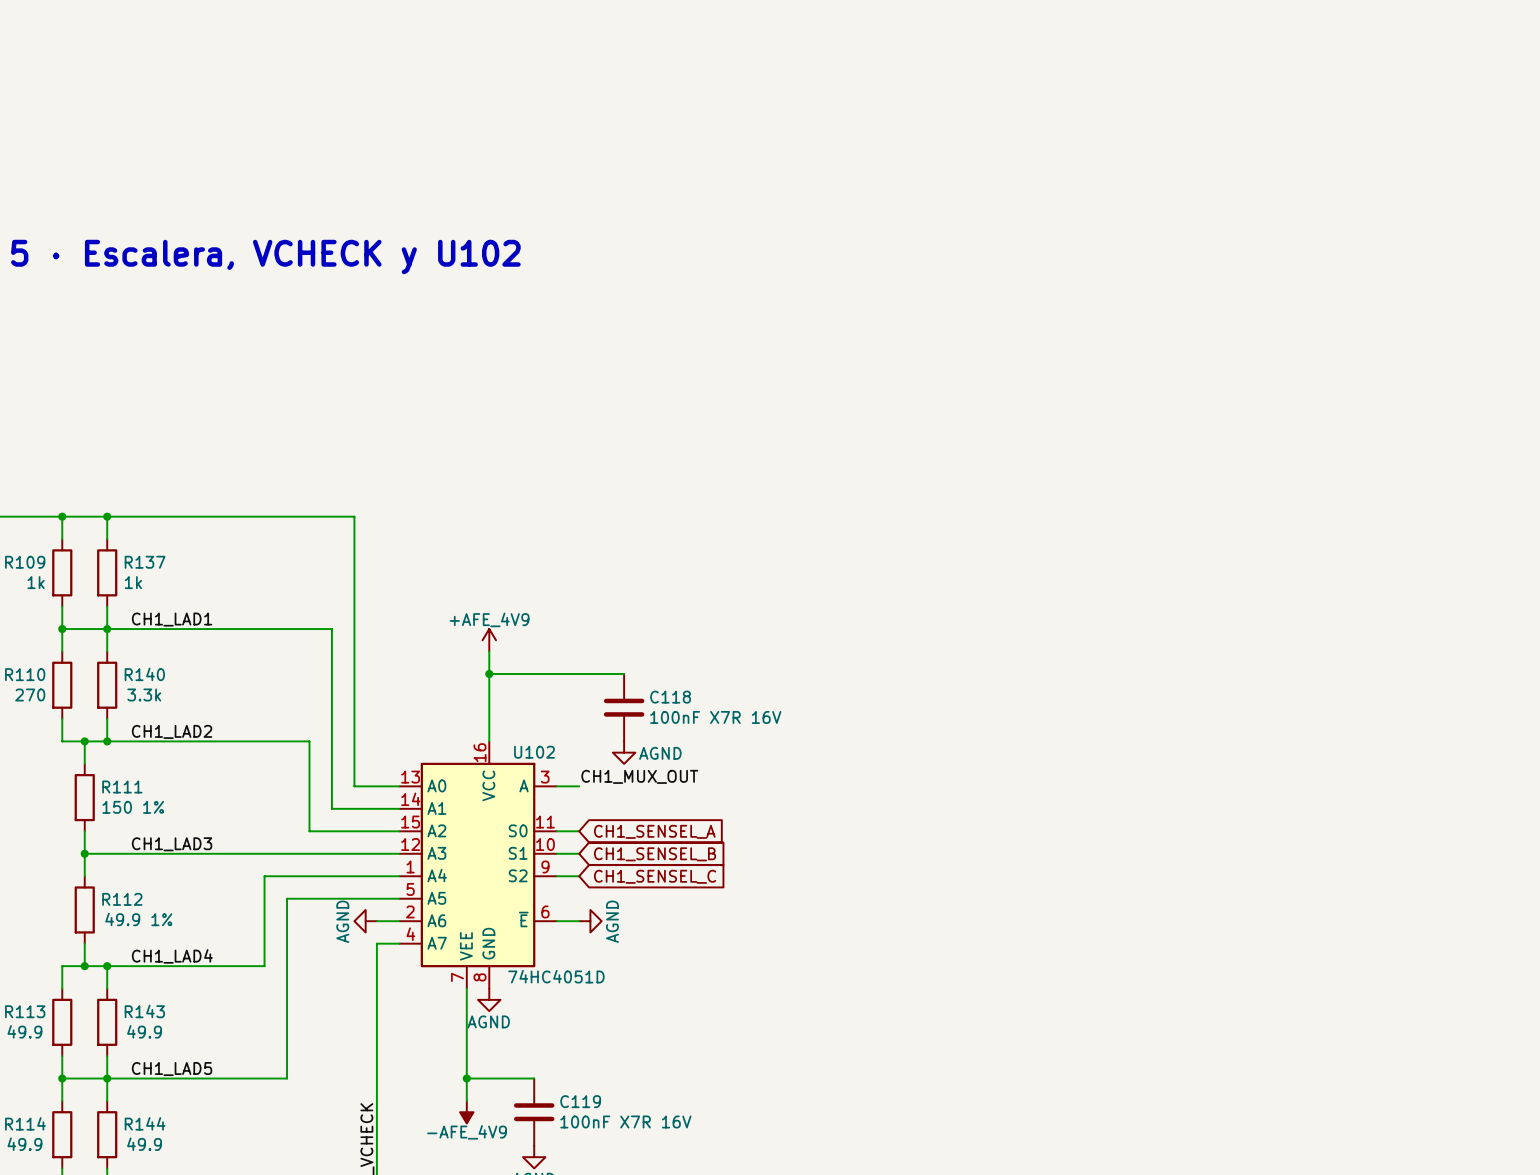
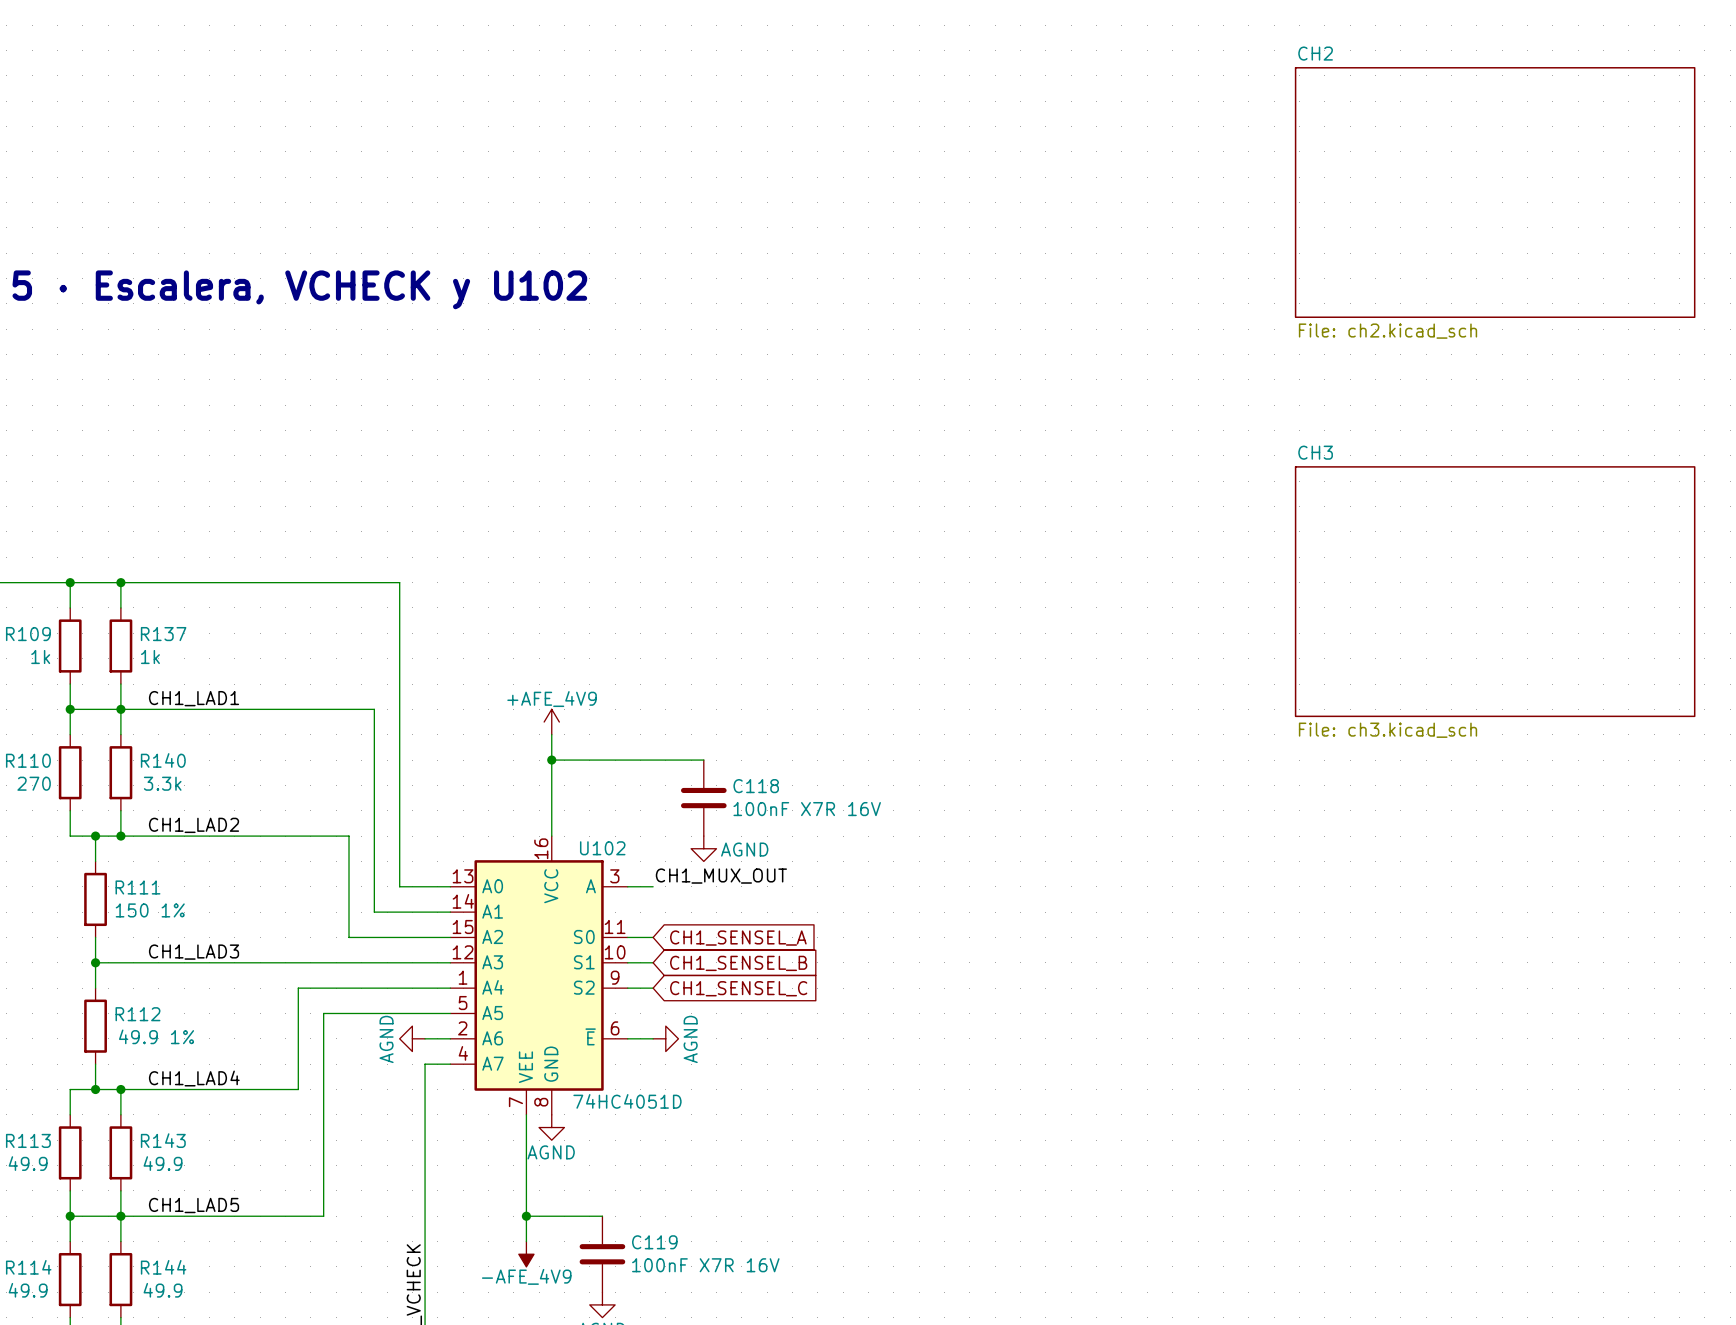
sheet CH2: none -> File: ch2.kicad_sch (1495, 192)
sheet CH3: none -> File: ch3.kicad_sch (1495, 591)

